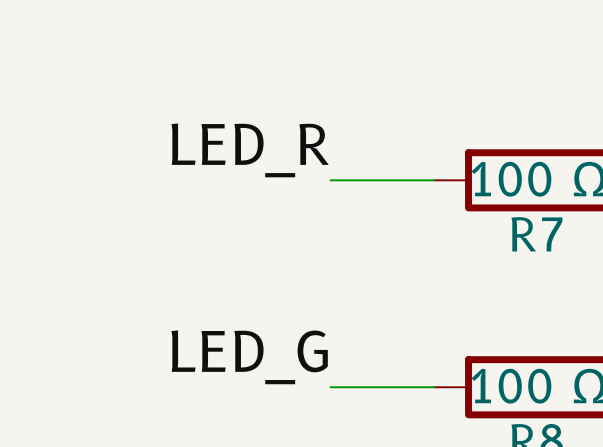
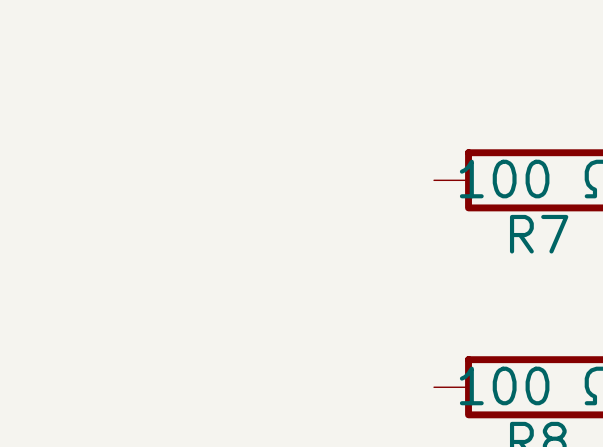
label: LED_R (250, 150) -> none
wire: (330, 180) (434, 180) -> none
label: LED_G (249, 357) -> none
wire: (330, 387) (434, 387) -> none

